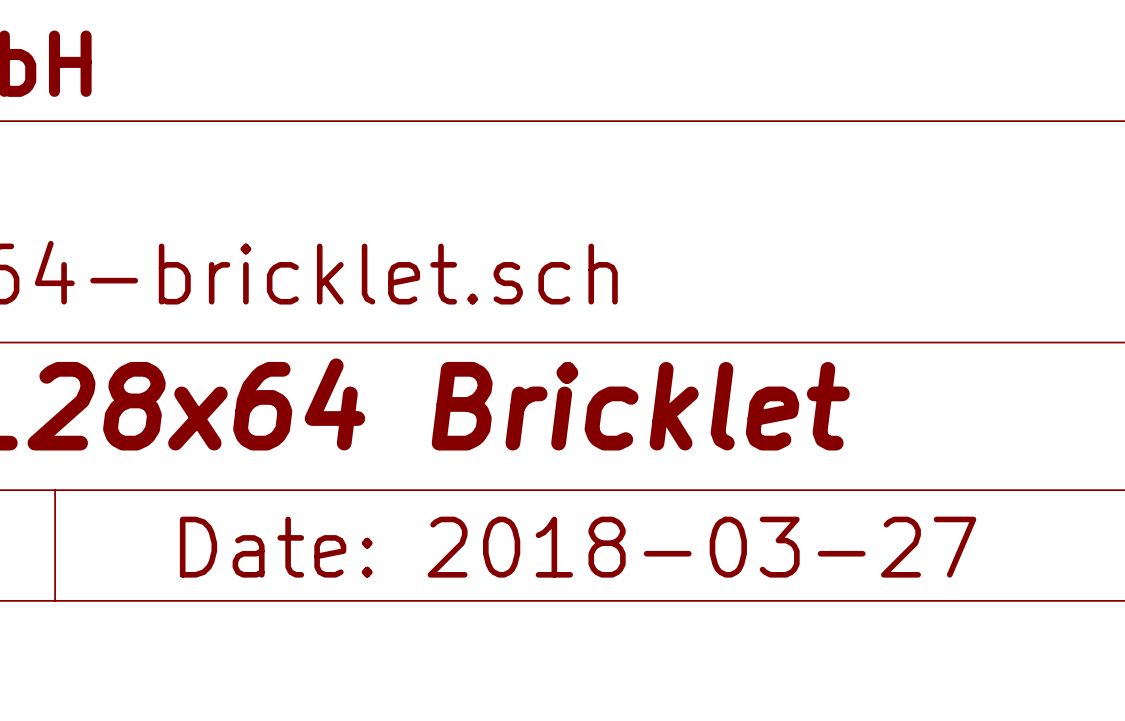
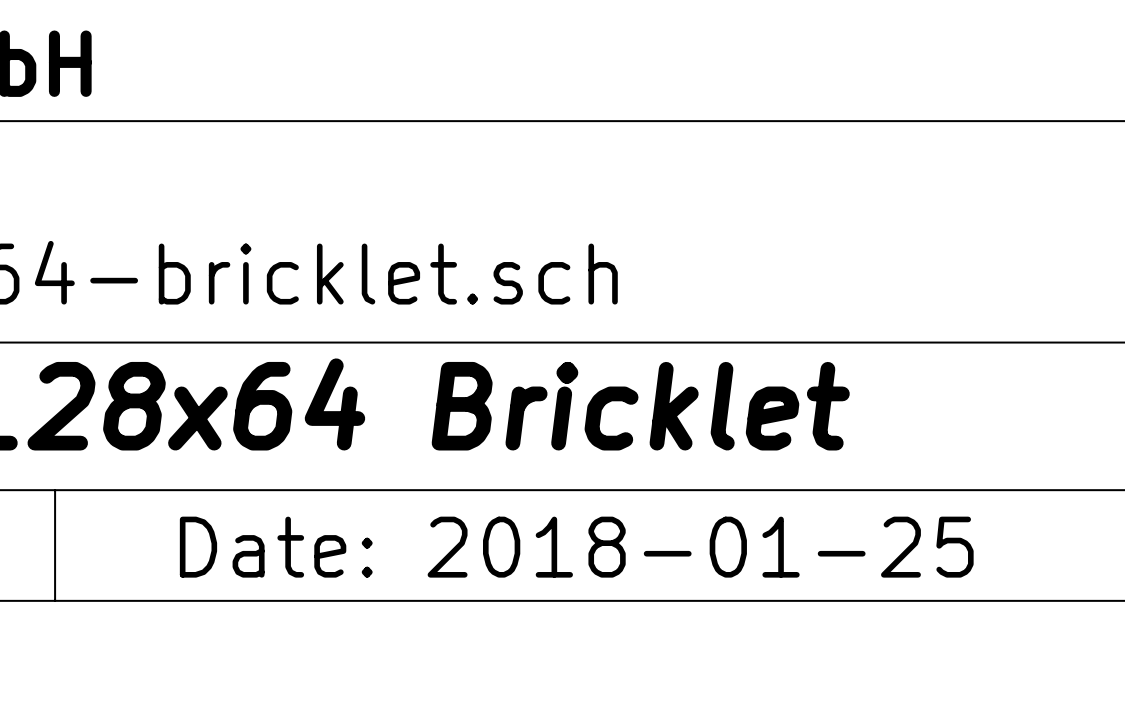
title block: Date: 2018-03-27 (578, 547) -> Date: 2018-01-25 (576, 547)

